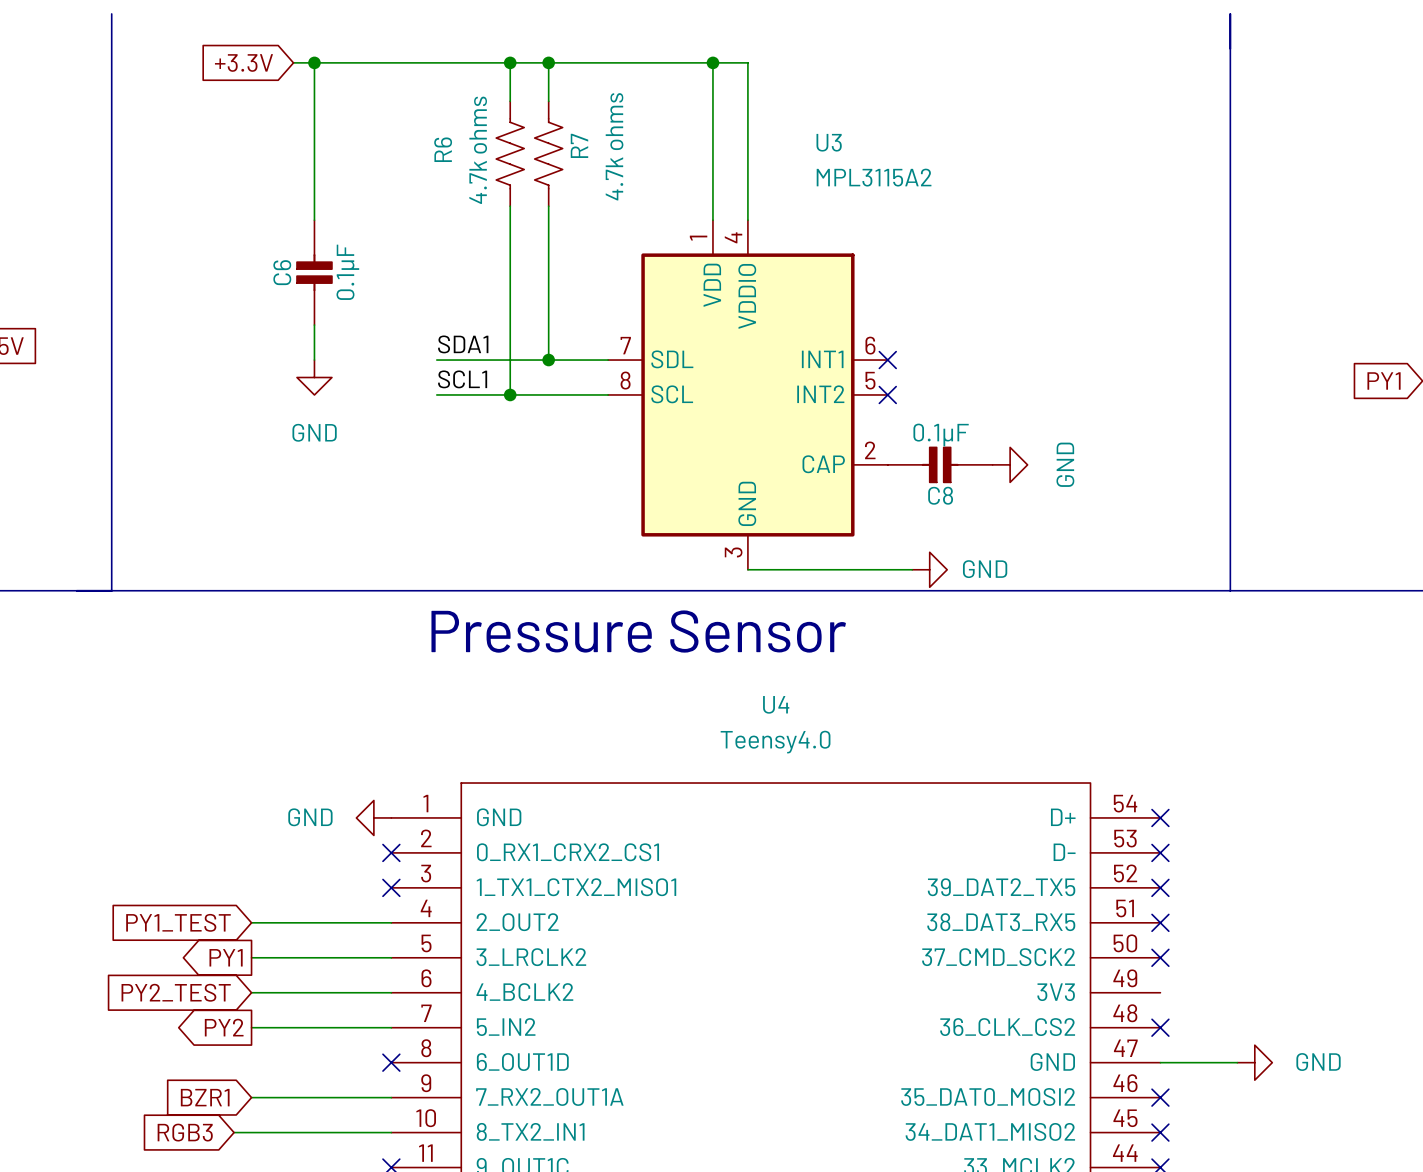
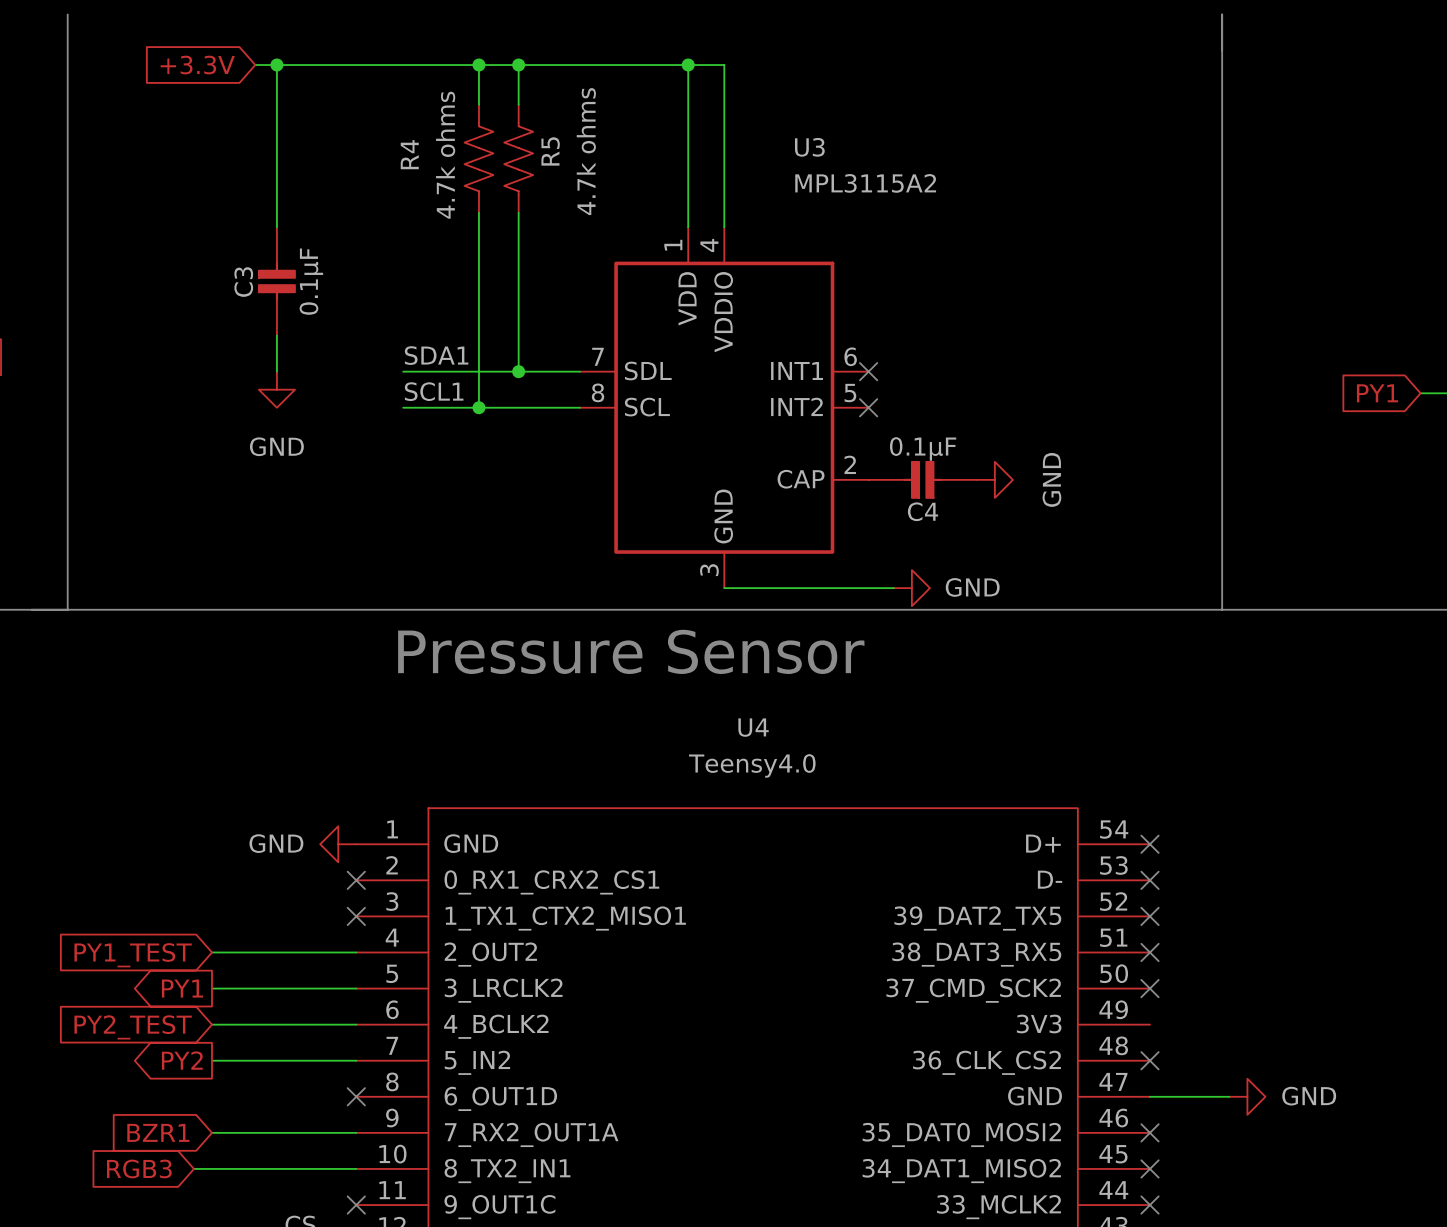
R7 name: R7 (579, 145) -> R5 (550, 151)
R6 name: R6 (443, 149) -> R4 (409, 154)
C6 name: C6 (282, 272) -> C3 (243, 282)
C8 name: C8 (940, 495) -> C4 (923, 511)

